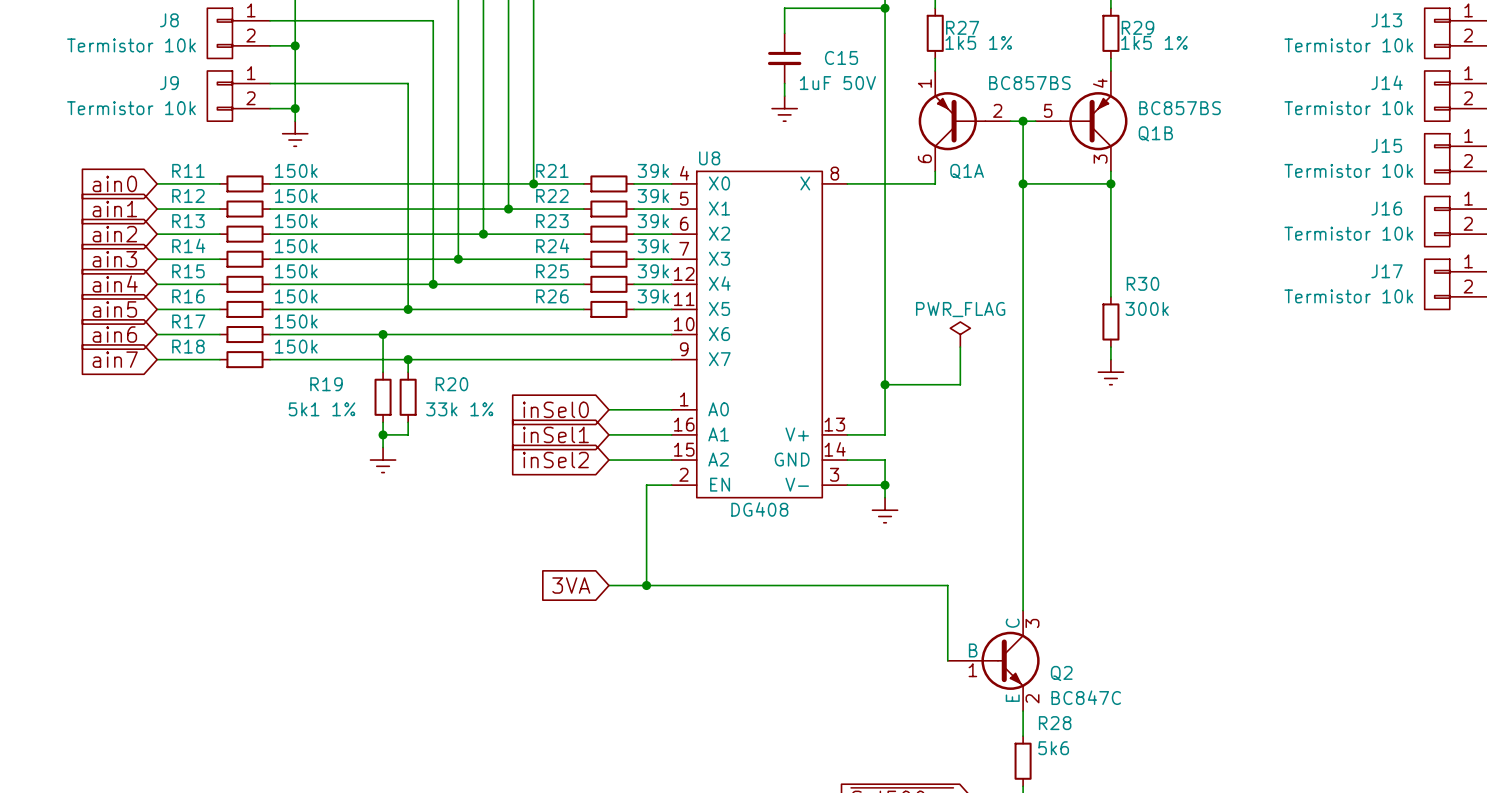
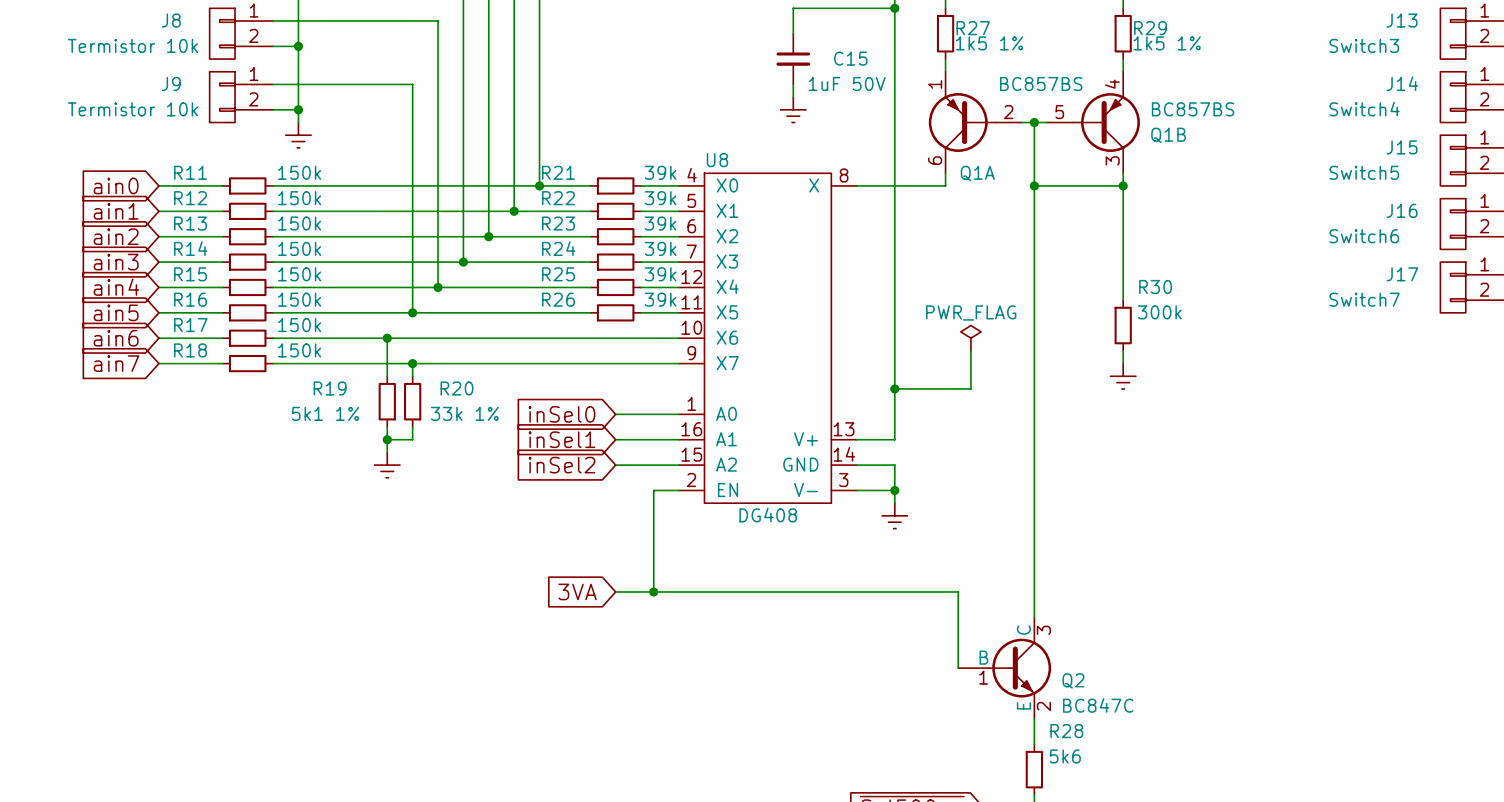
J13 value: Termistor 10k (1348, 45) -> Switch3 (1364, 45)
J14 value: Termistor 10k (1348, 108) -> Switch4 (1364, 109)
J15 value: Termistor 10k (1348, 170) -> Switch5 (1364, 172)
J16 value: Termistor 10k (1348, 233) -> Switch6 (1364, 236)
J17 value: Termistor 10k (1348, 296) -> Switch7 (1364, 299)

